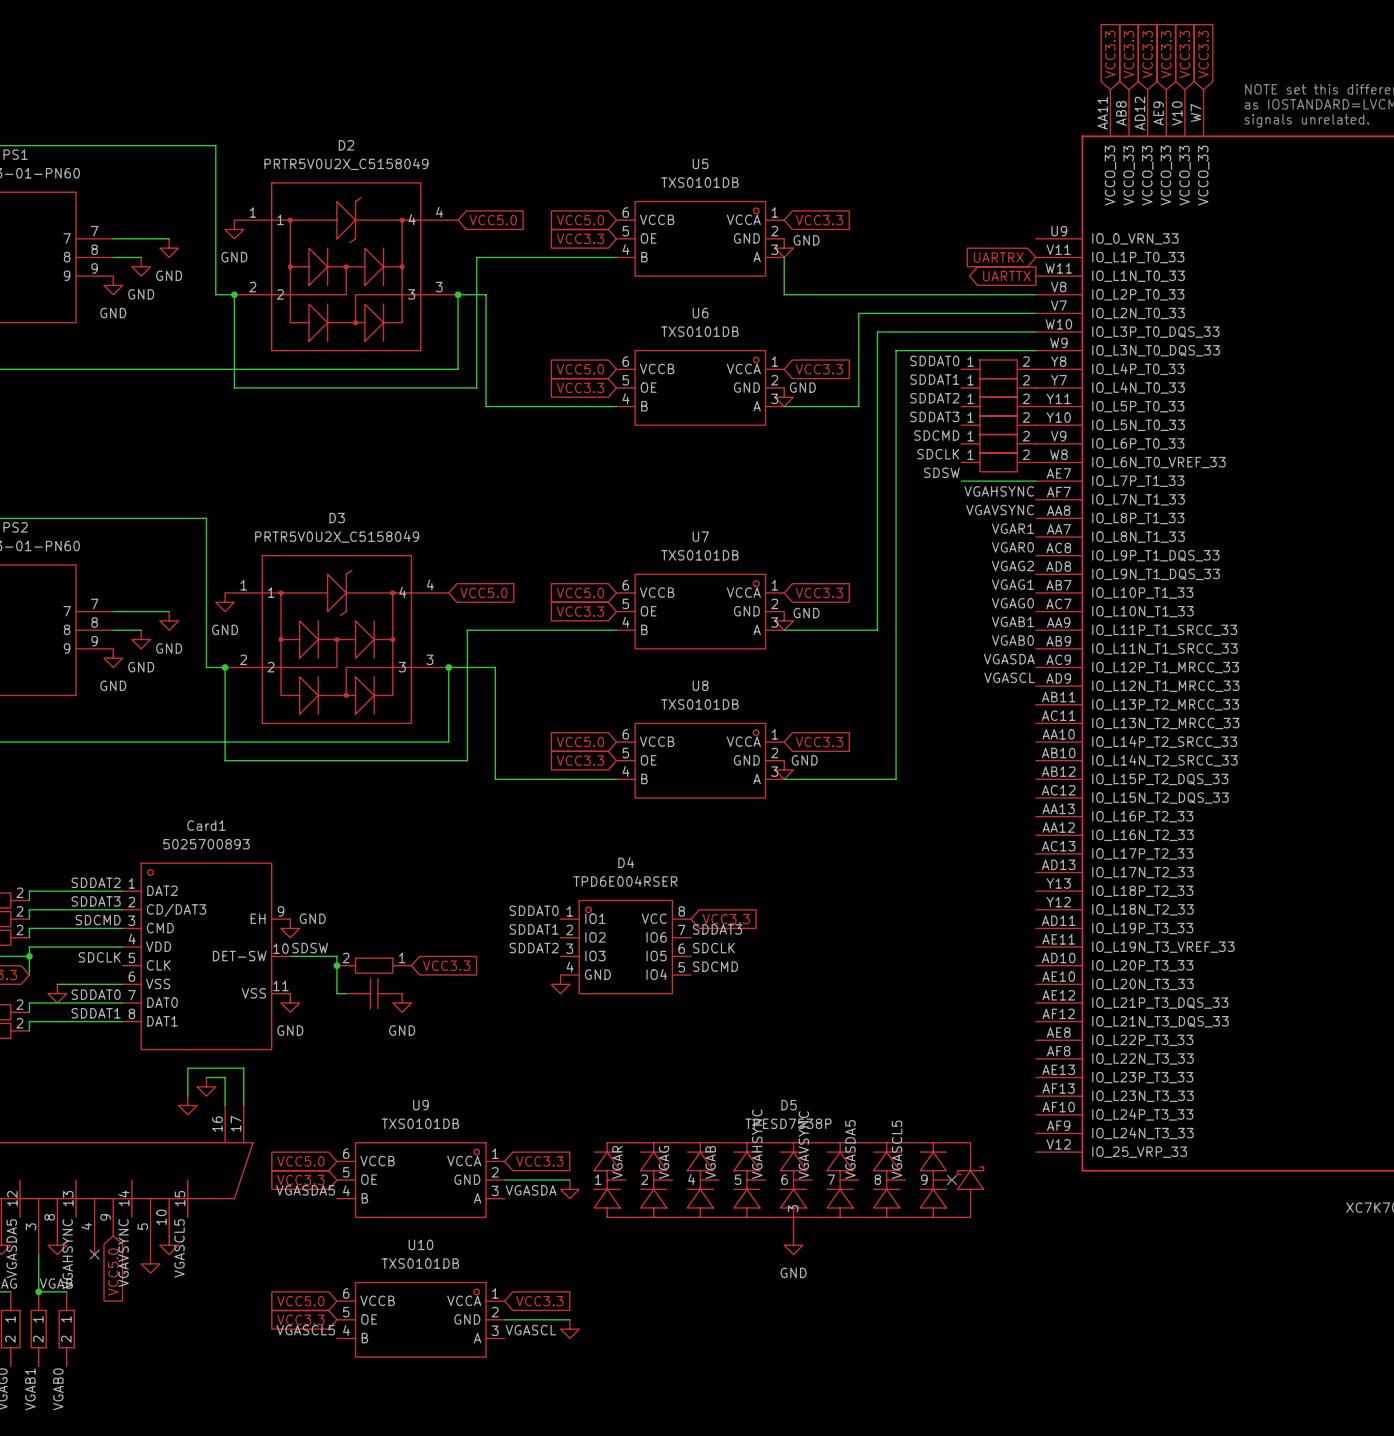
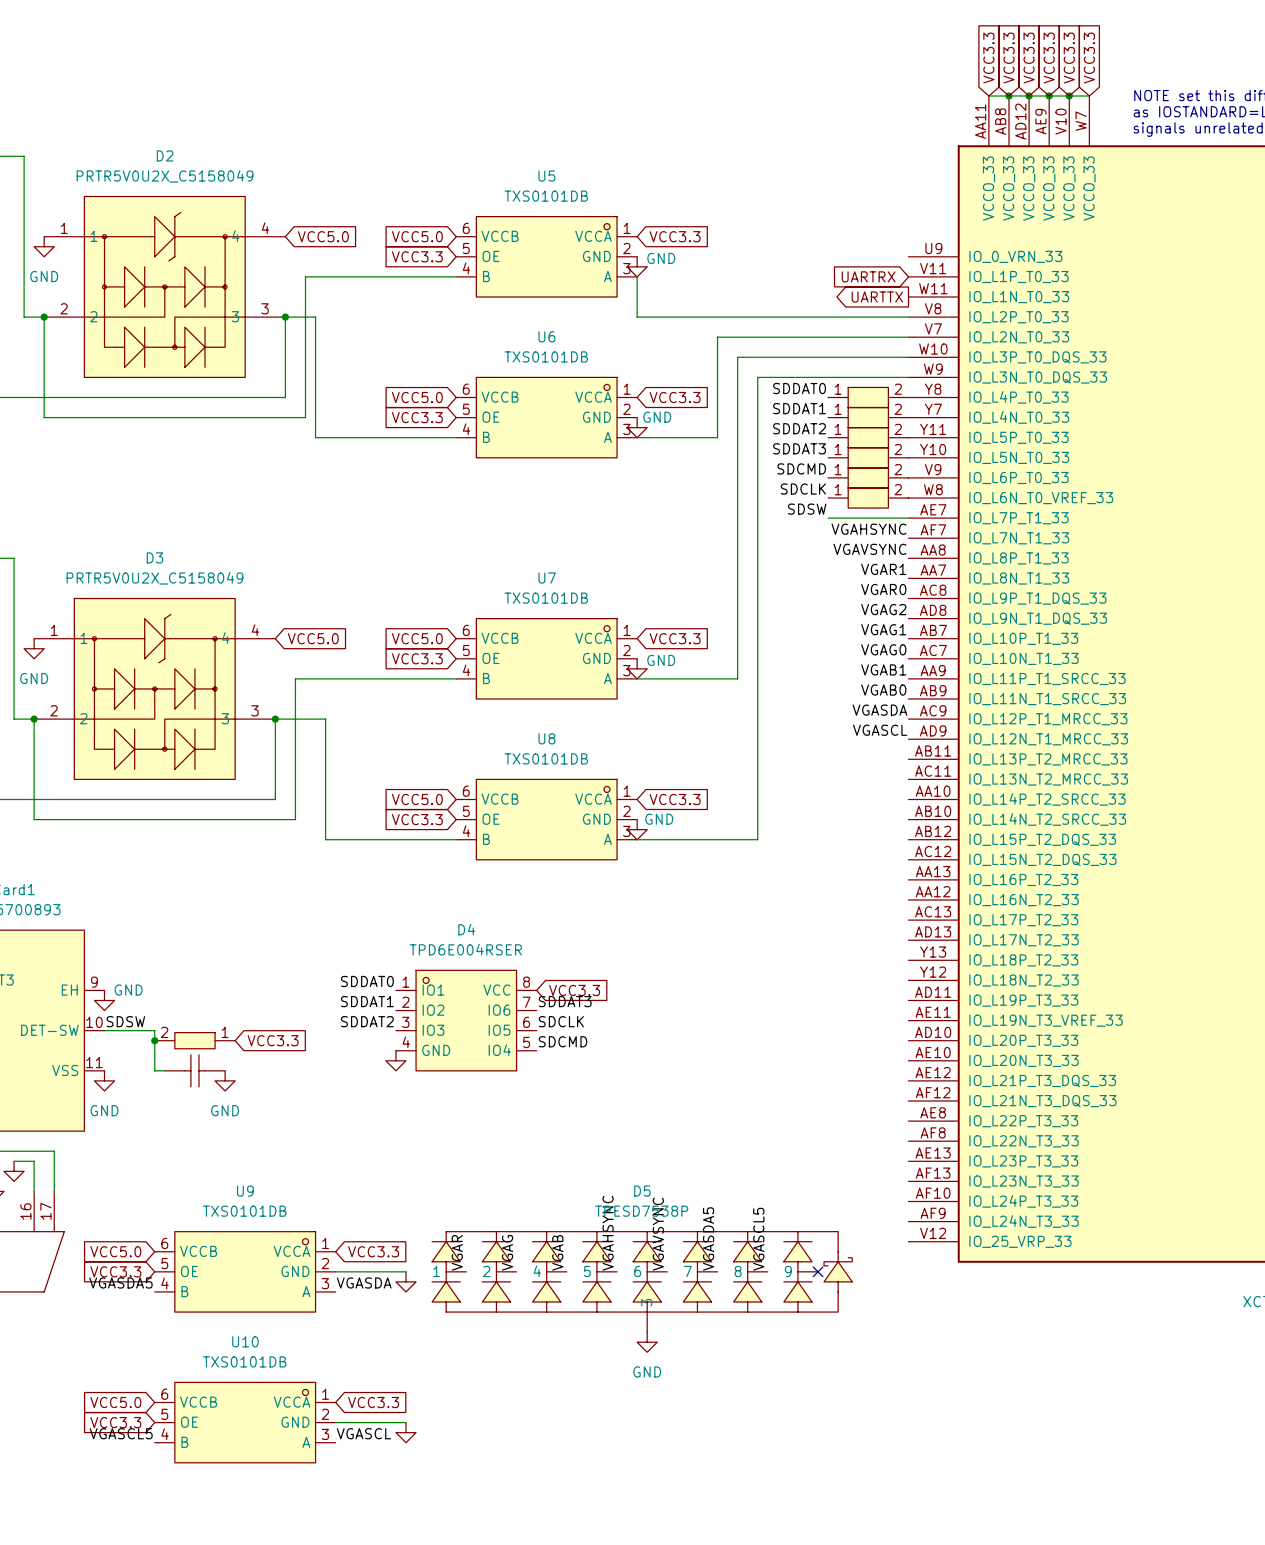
wire: none -> (988, 96) (1089, 96)
junction: none -> (1008, 96)
junction: none -> (1029, 96)
junction: none -> (1049, 96)
junction: none -> (1069, 96)

